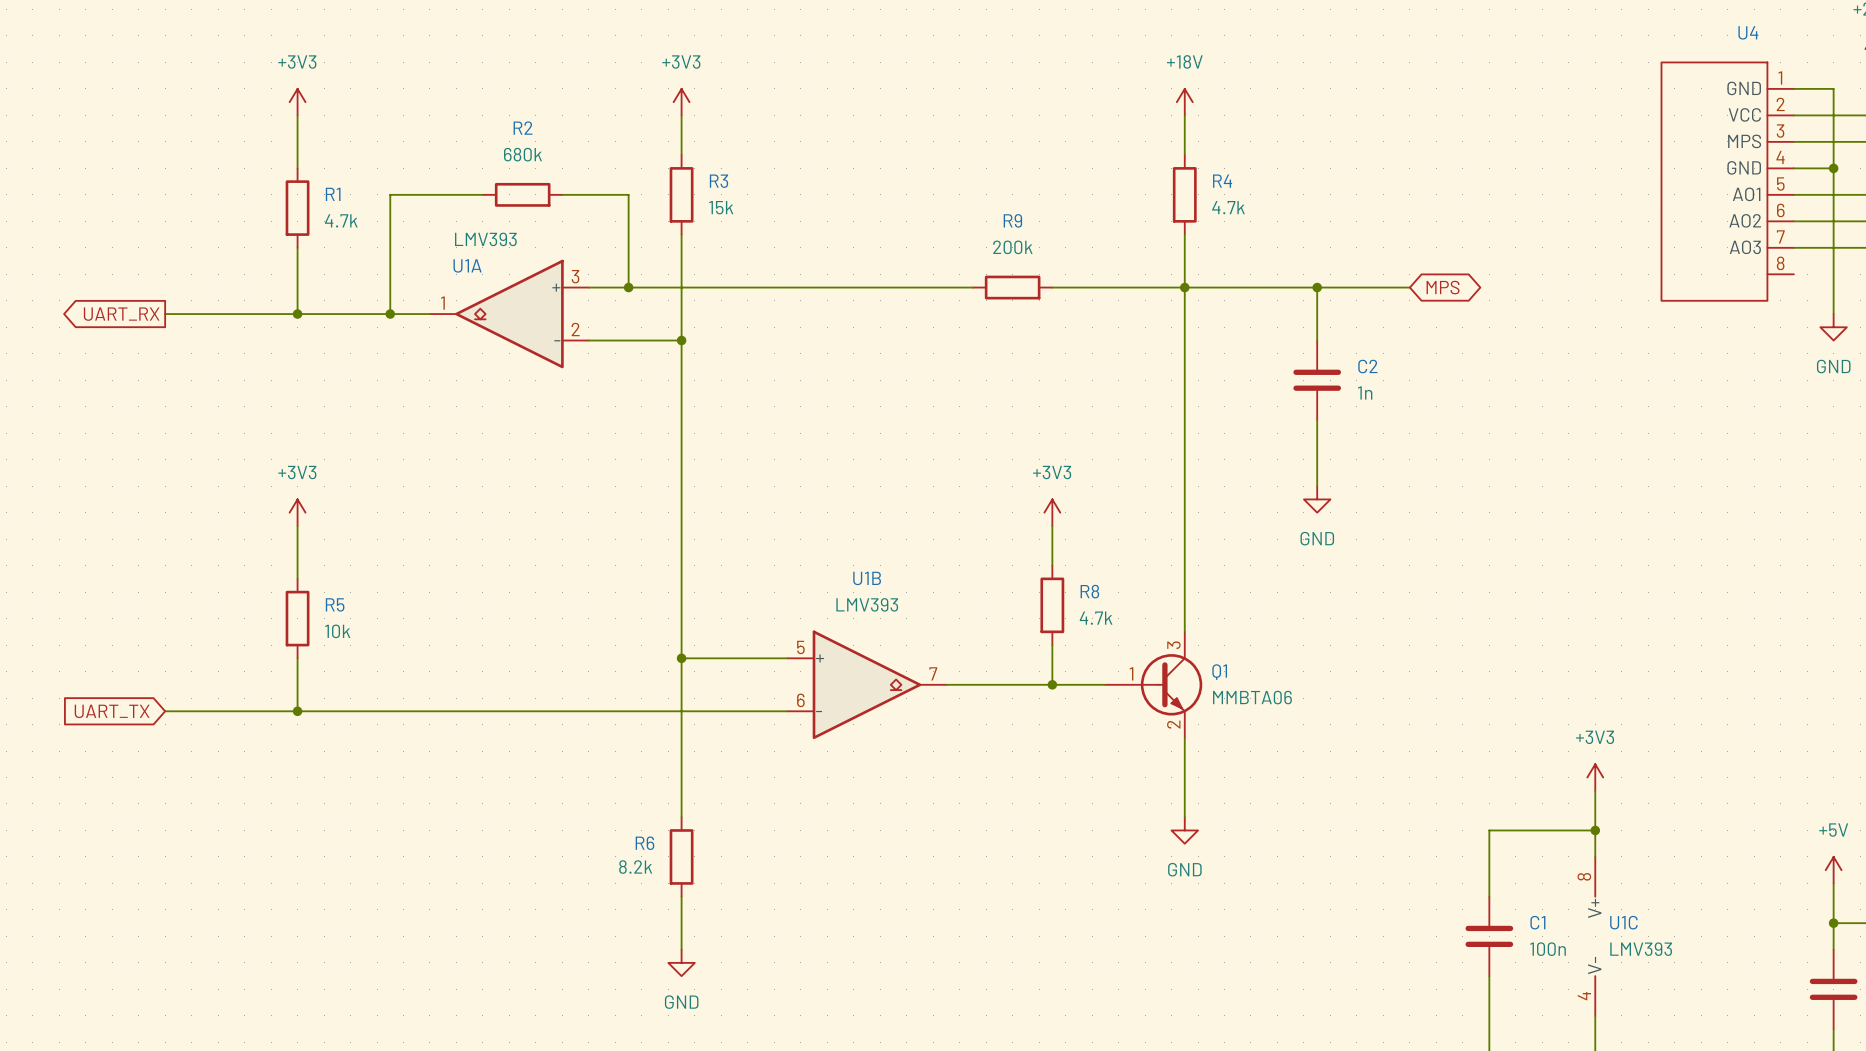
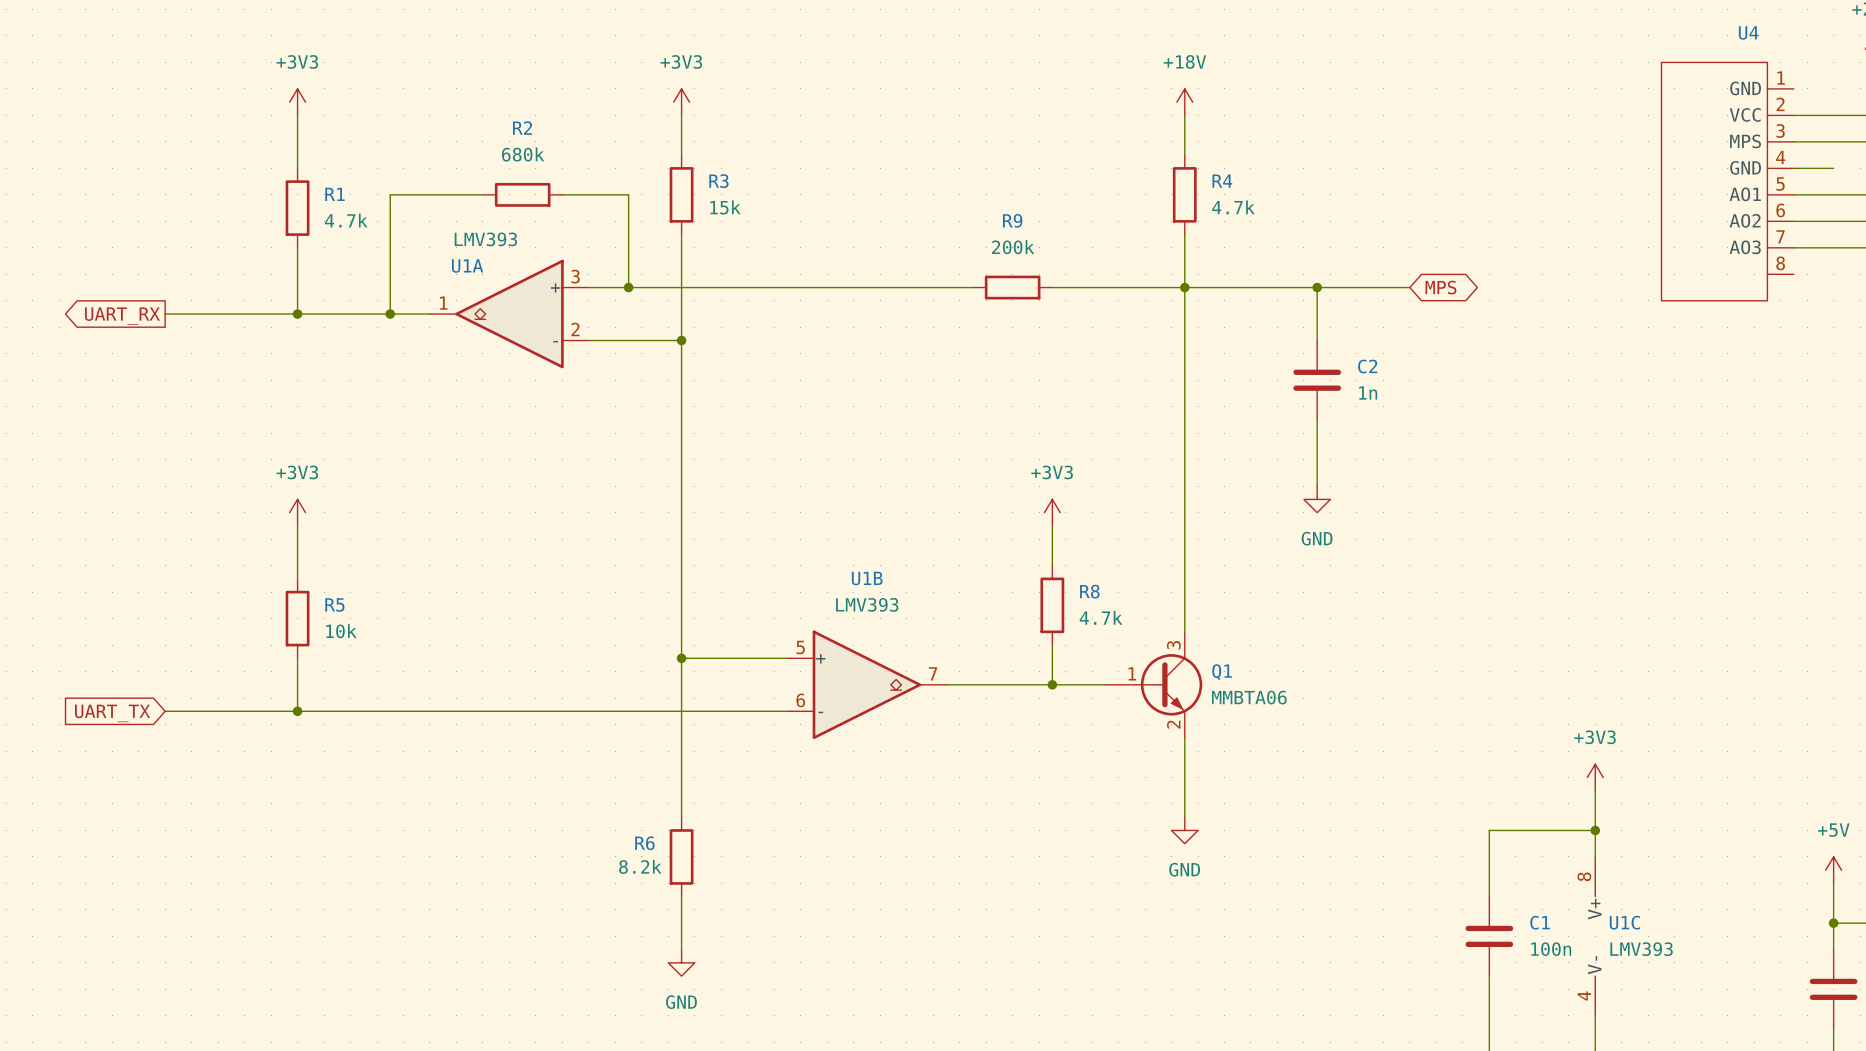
wire: (1793, 88) (1833, 88) (1833, 314) -> none
junction: (1833, 168) -> none
power symbol: GND (1833, 327) -> none

